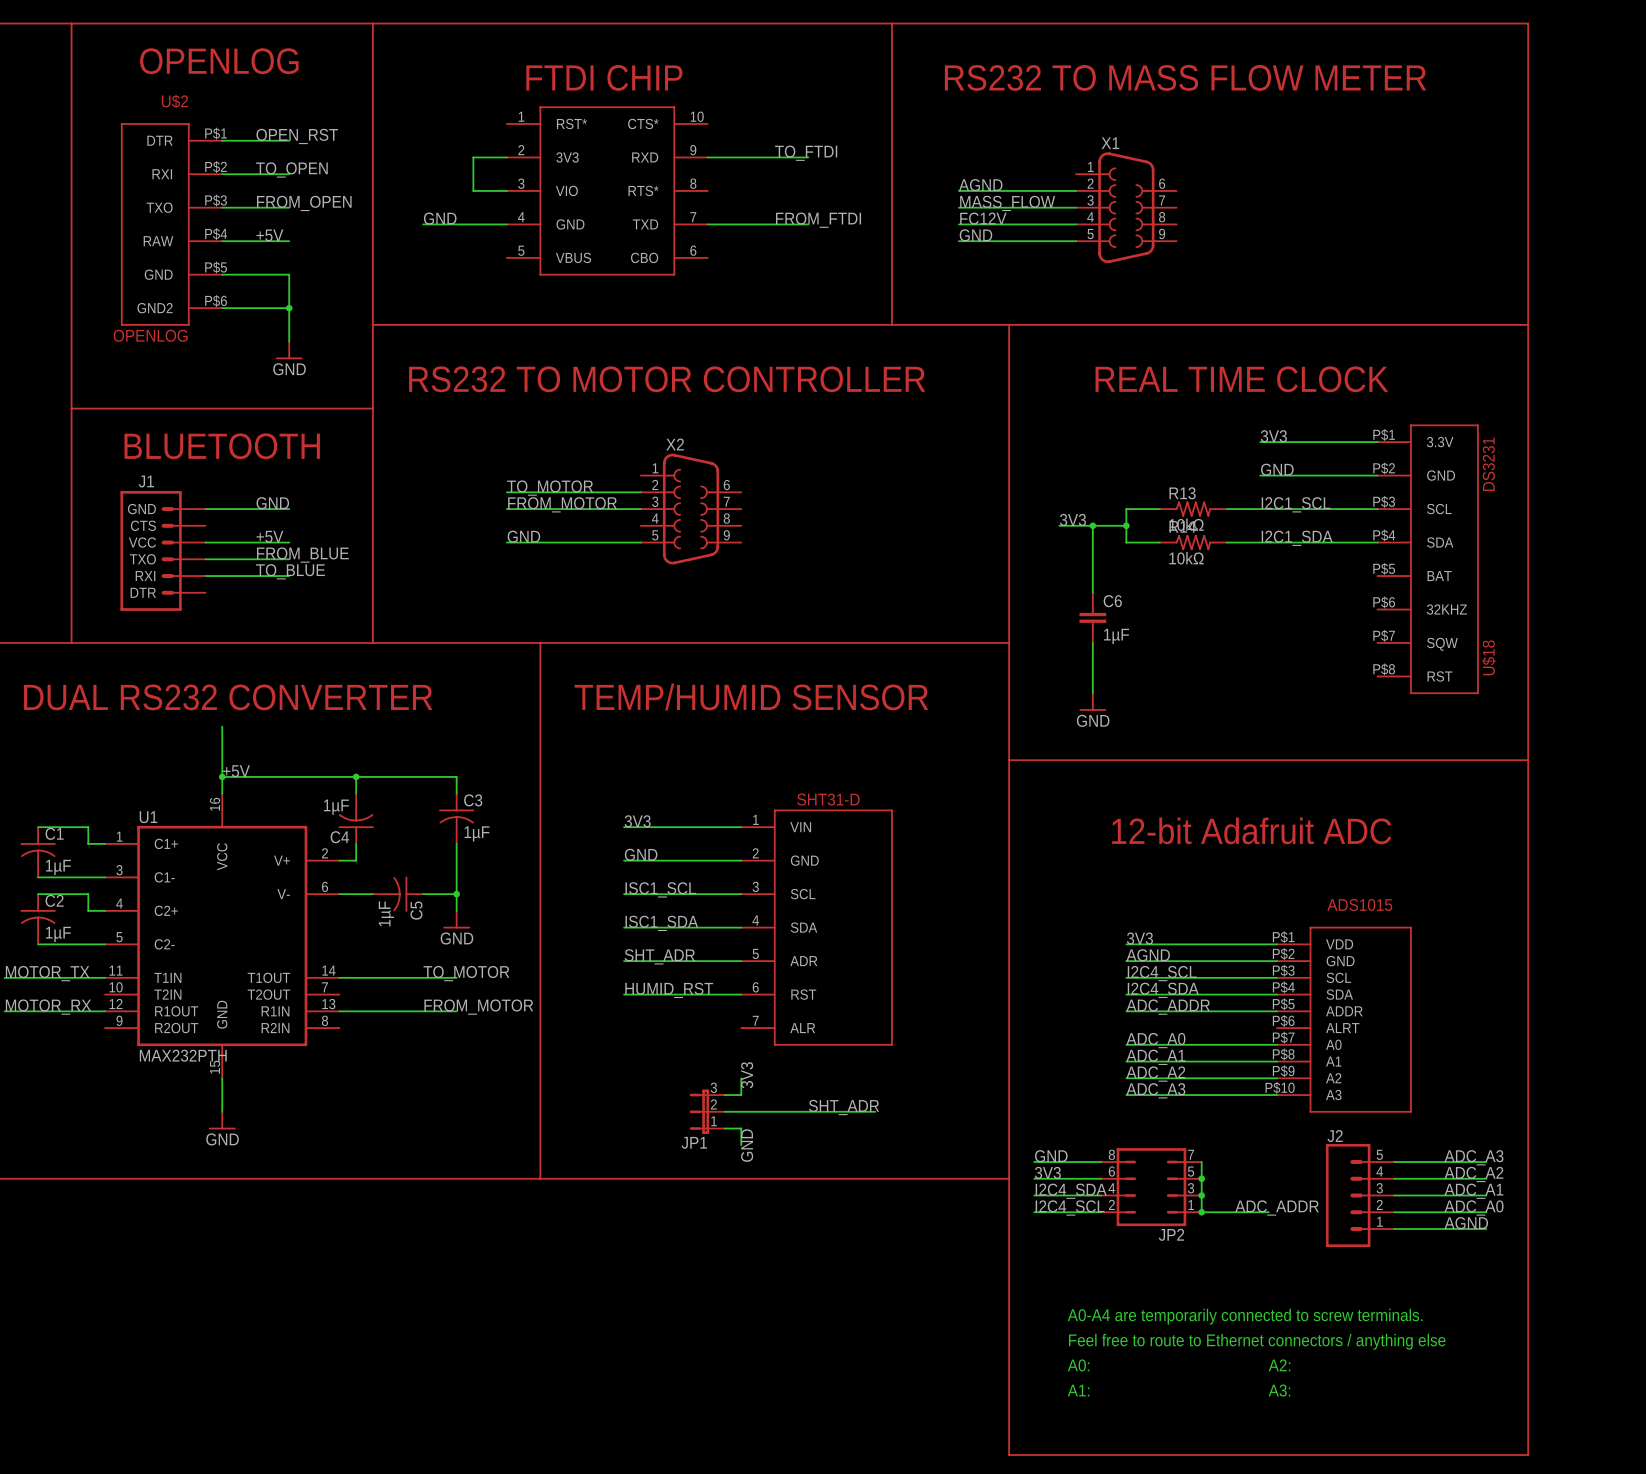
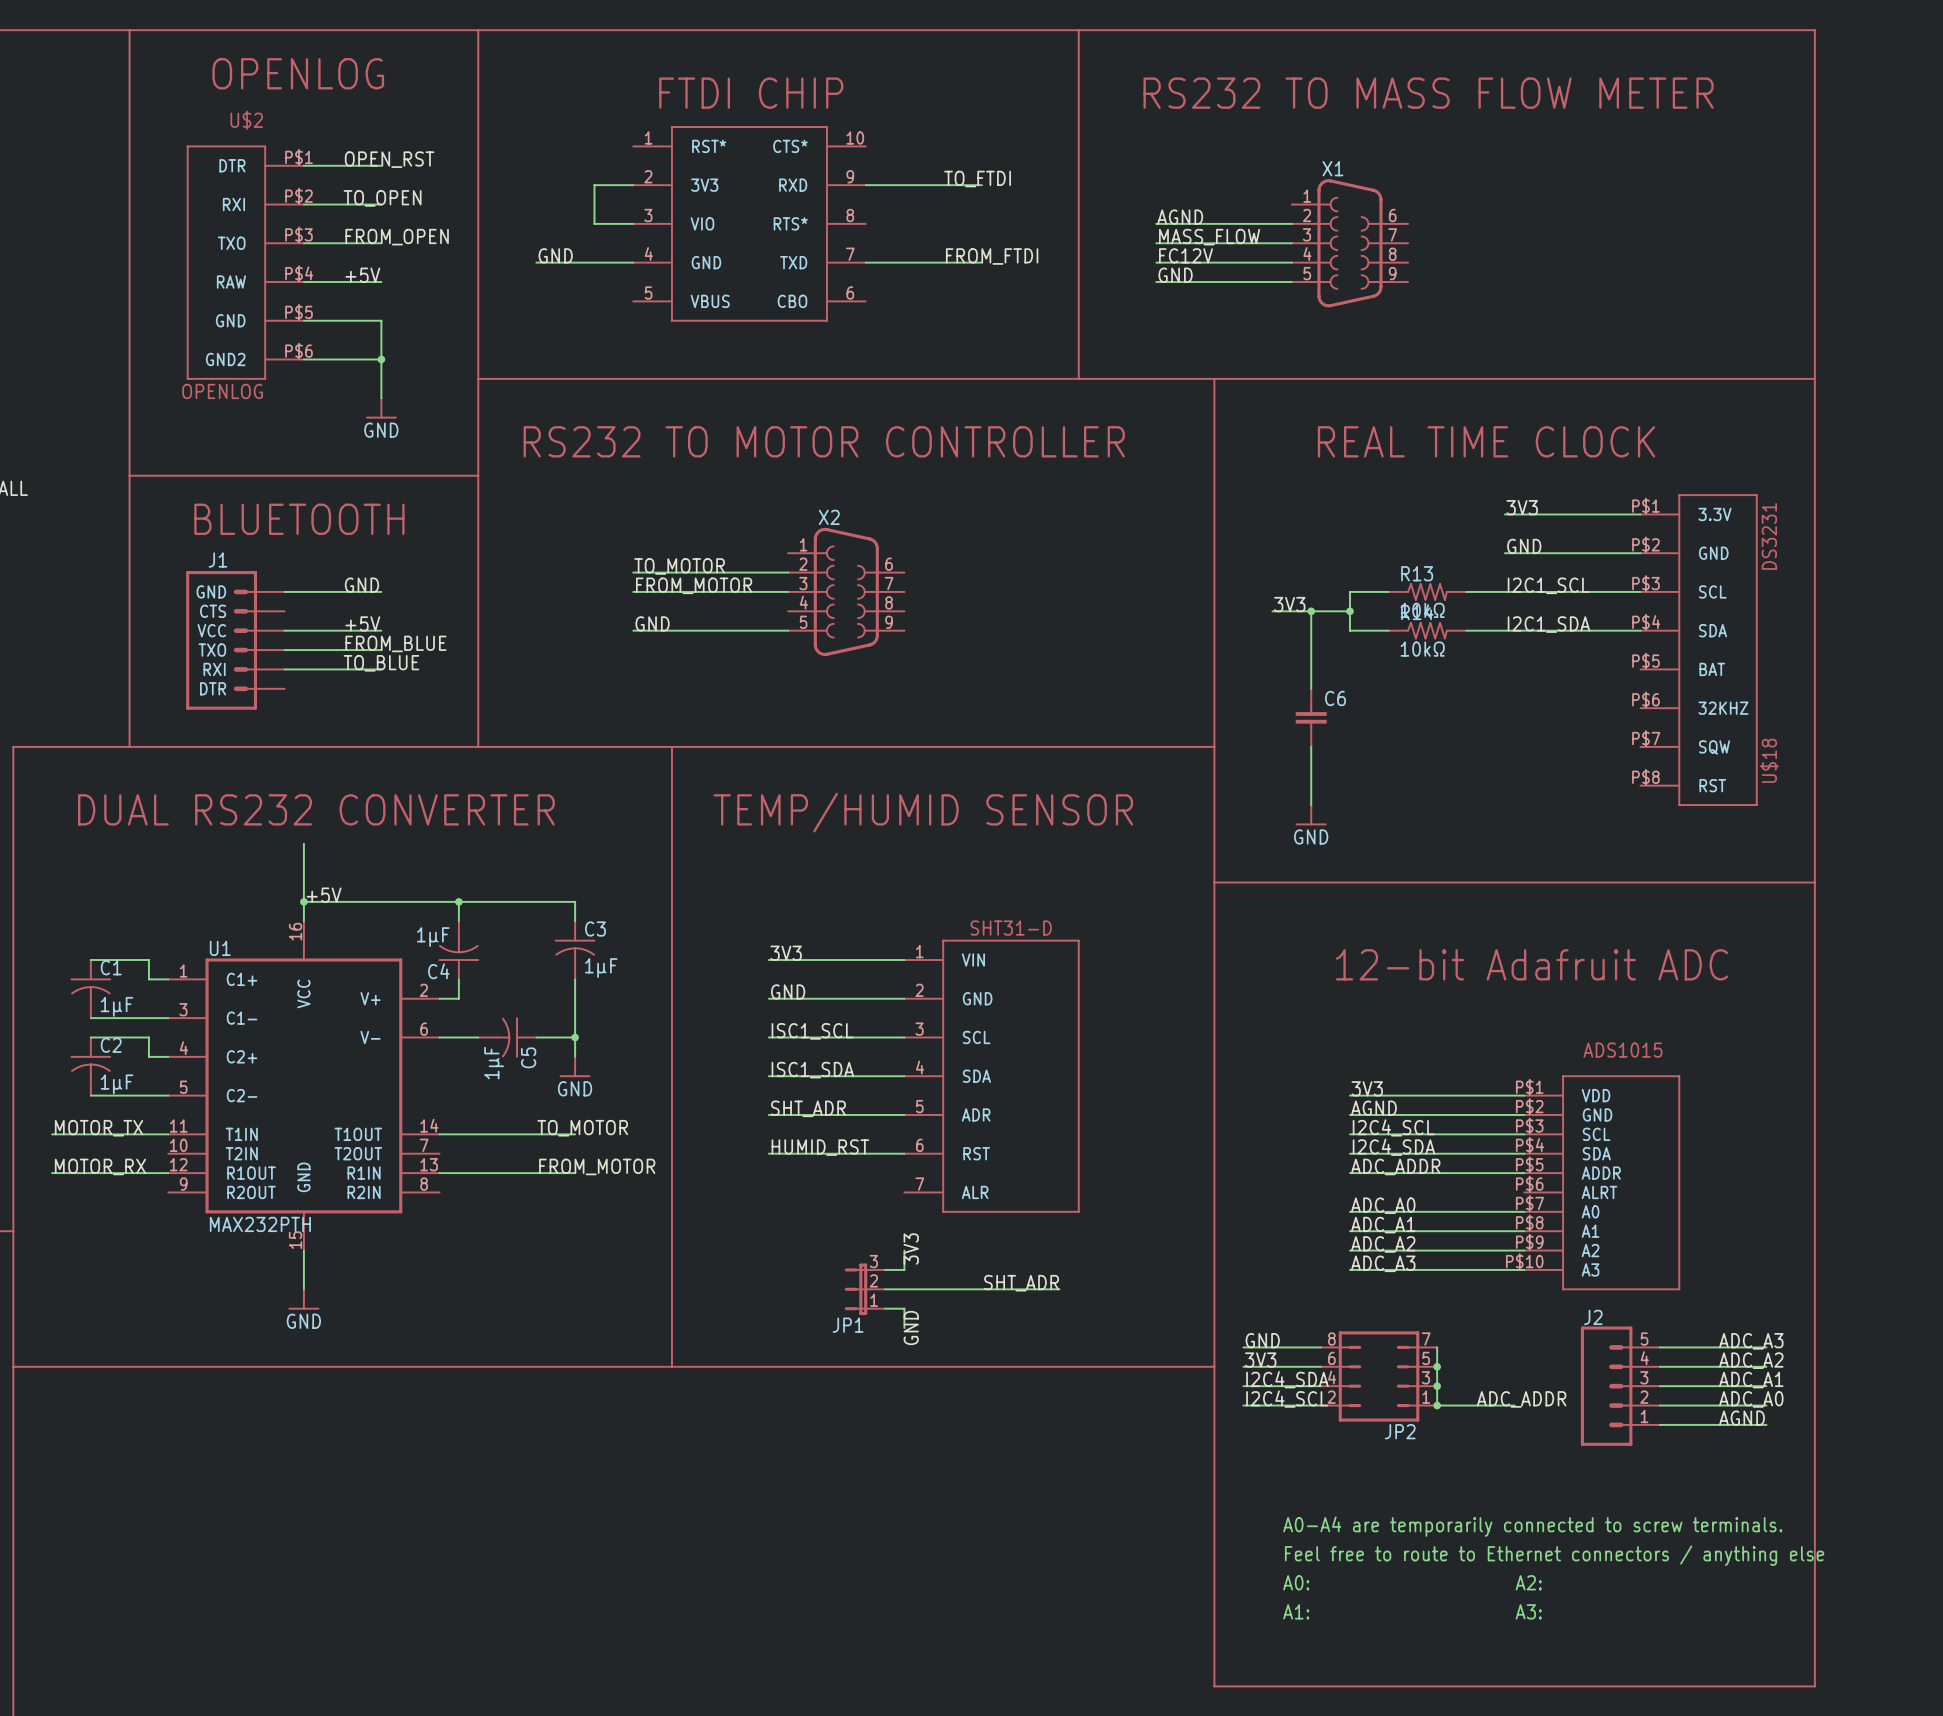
C6 value: 1µF (1116, 636) -> none

